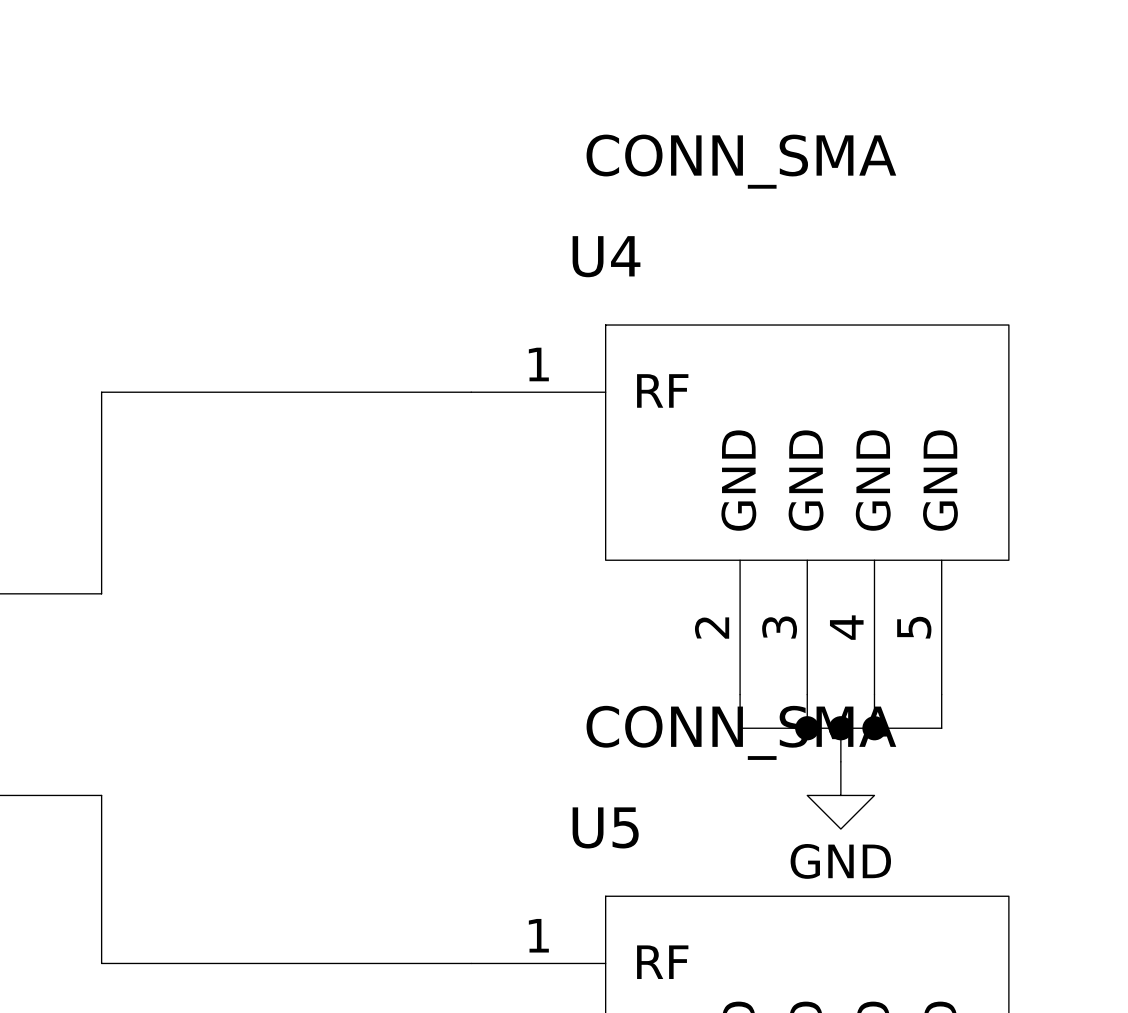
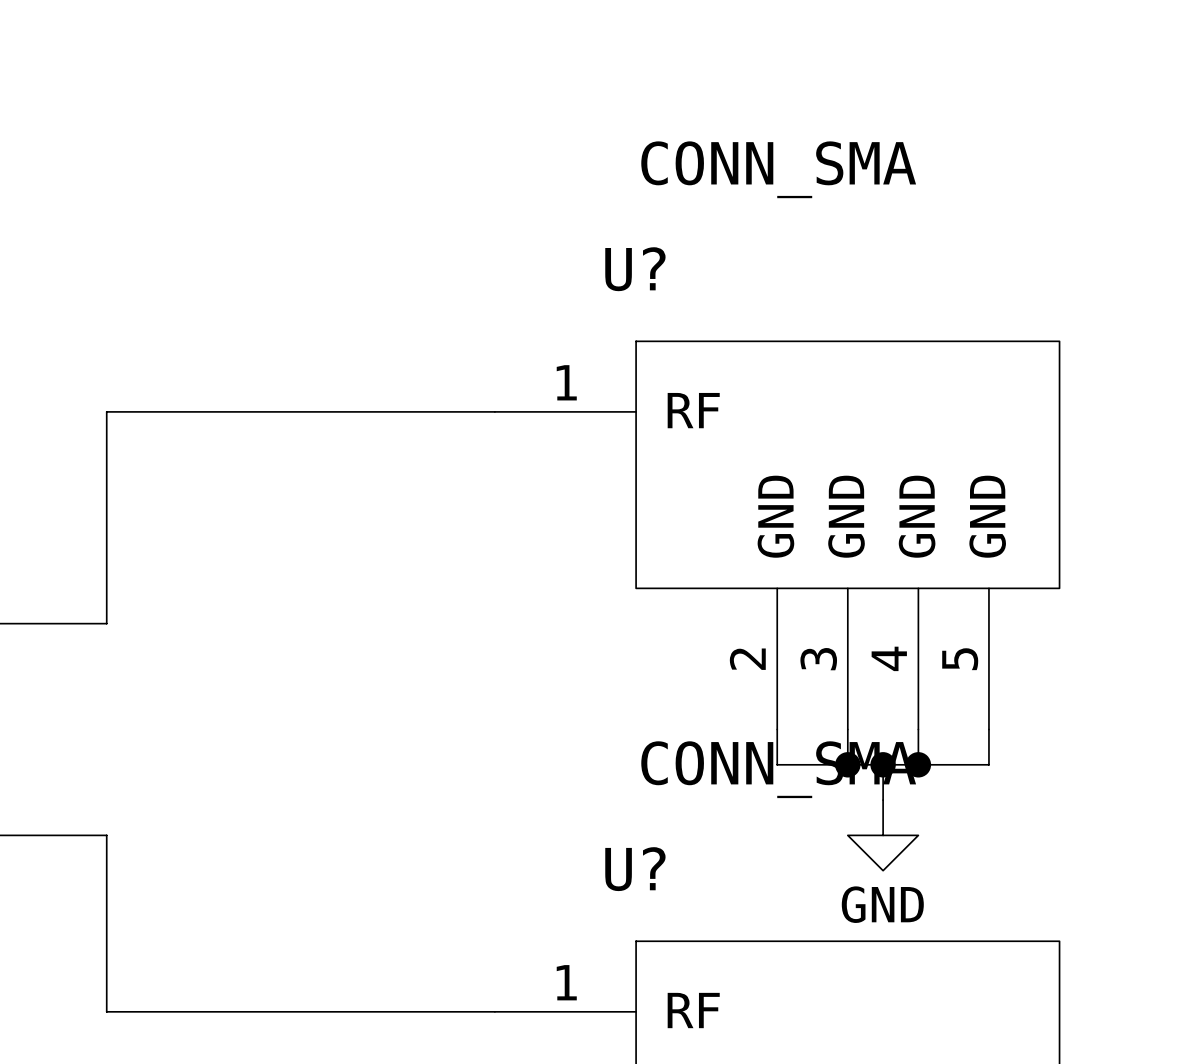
U4 name: U4 (606, 256) -> U? (635, 269)
U5 name: U5 (605, 827) -> U? (635, 869)

